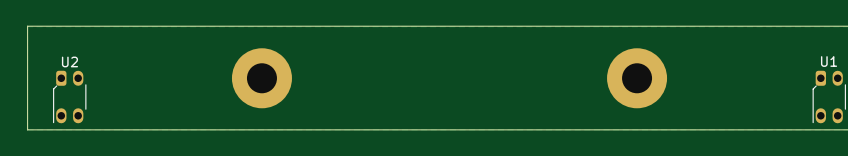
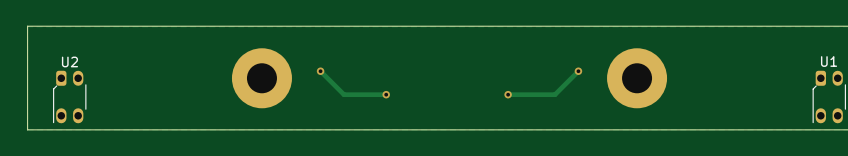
track: none -> (320, 71) (344, 94) (386, 94)
via: none -> (320, 71)
track: none -> (578, 71) (555, 94) (508, 94)
via: none -> (578, 71)
via: none -> (386, 94)
via: none -> (508, 94)

